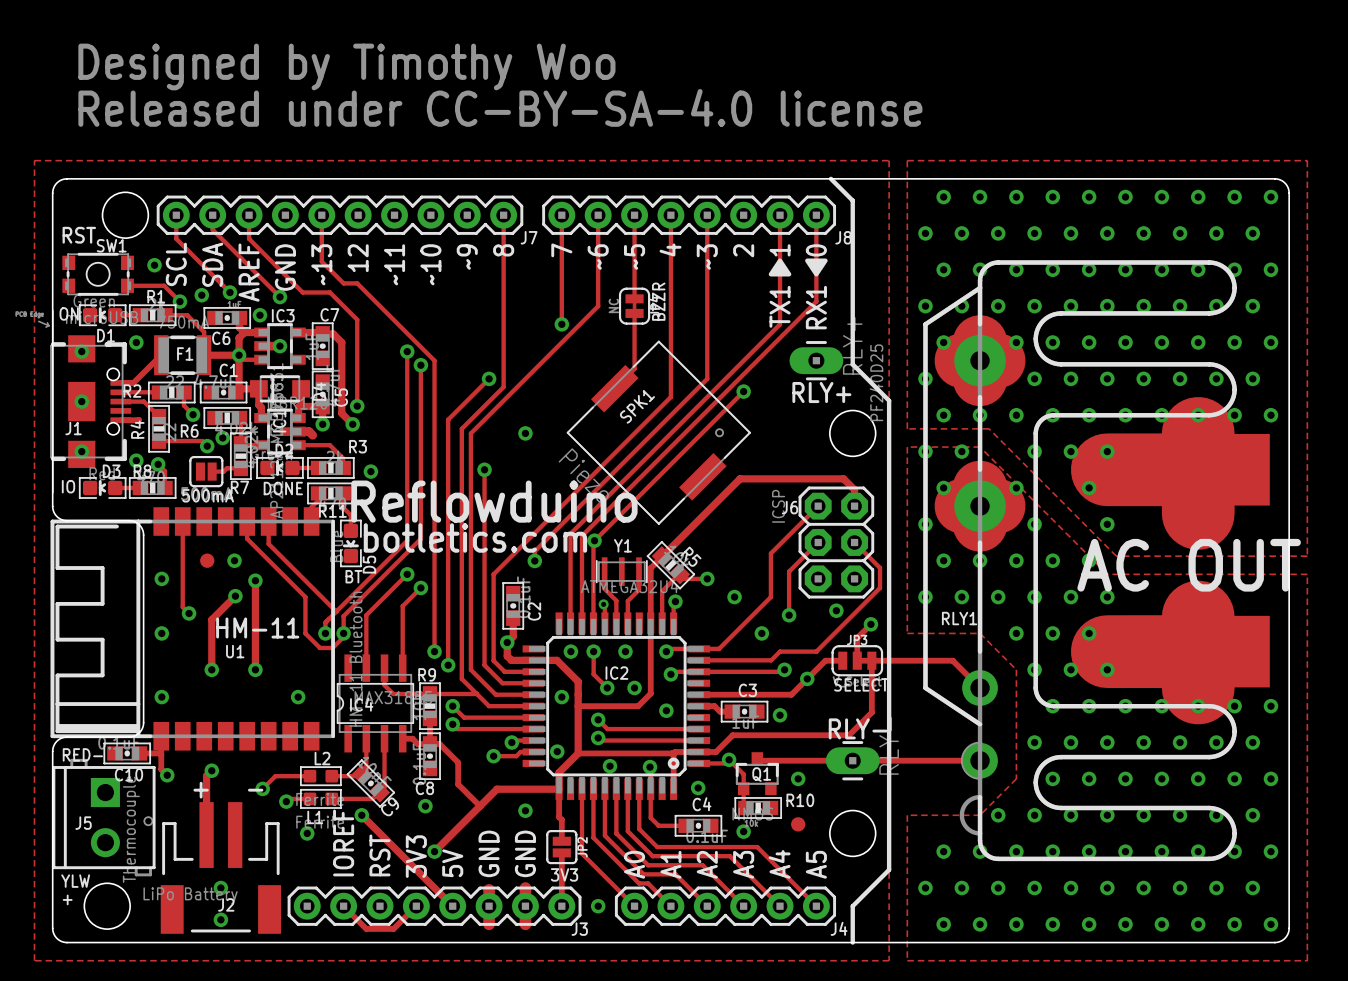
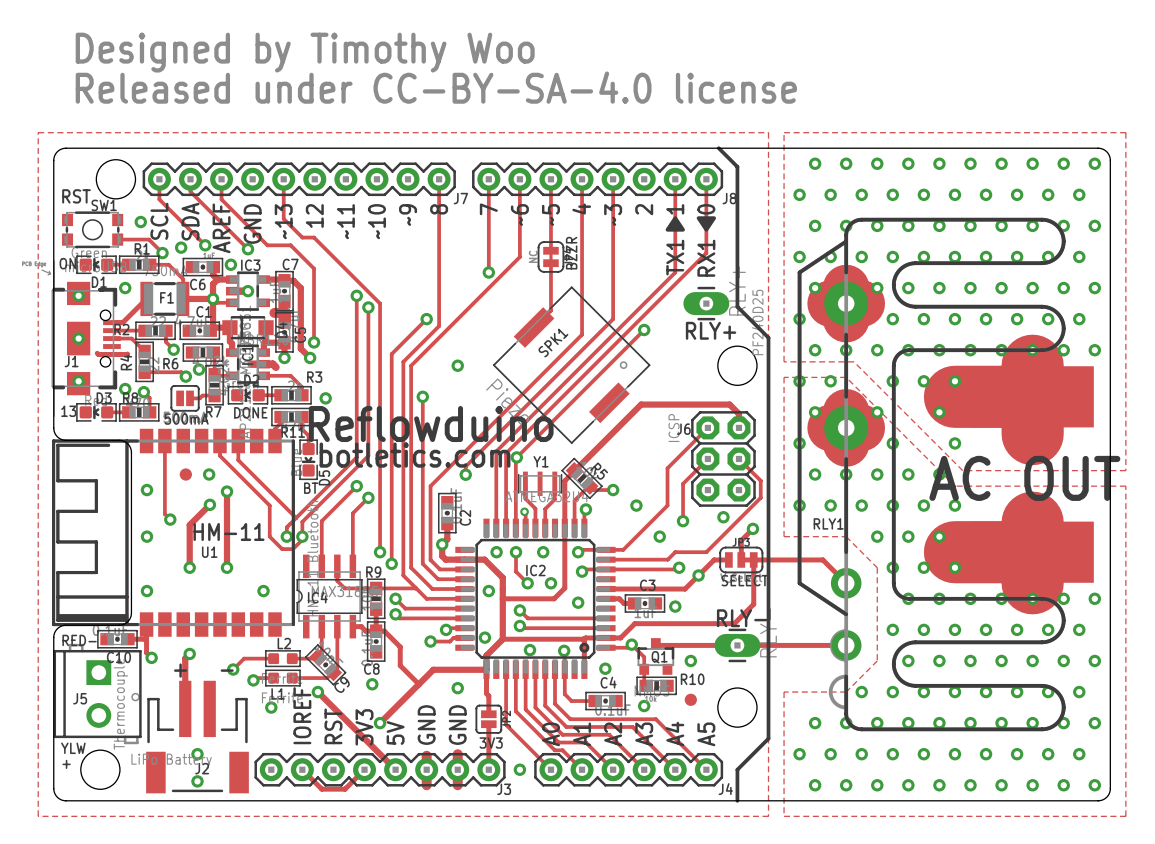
track: none -> (274, 312) (286, 312) (286, 321)
track: none -> (97, 353) (111, 354)
text: IO (68, 486) -> 13 (68, 411)

